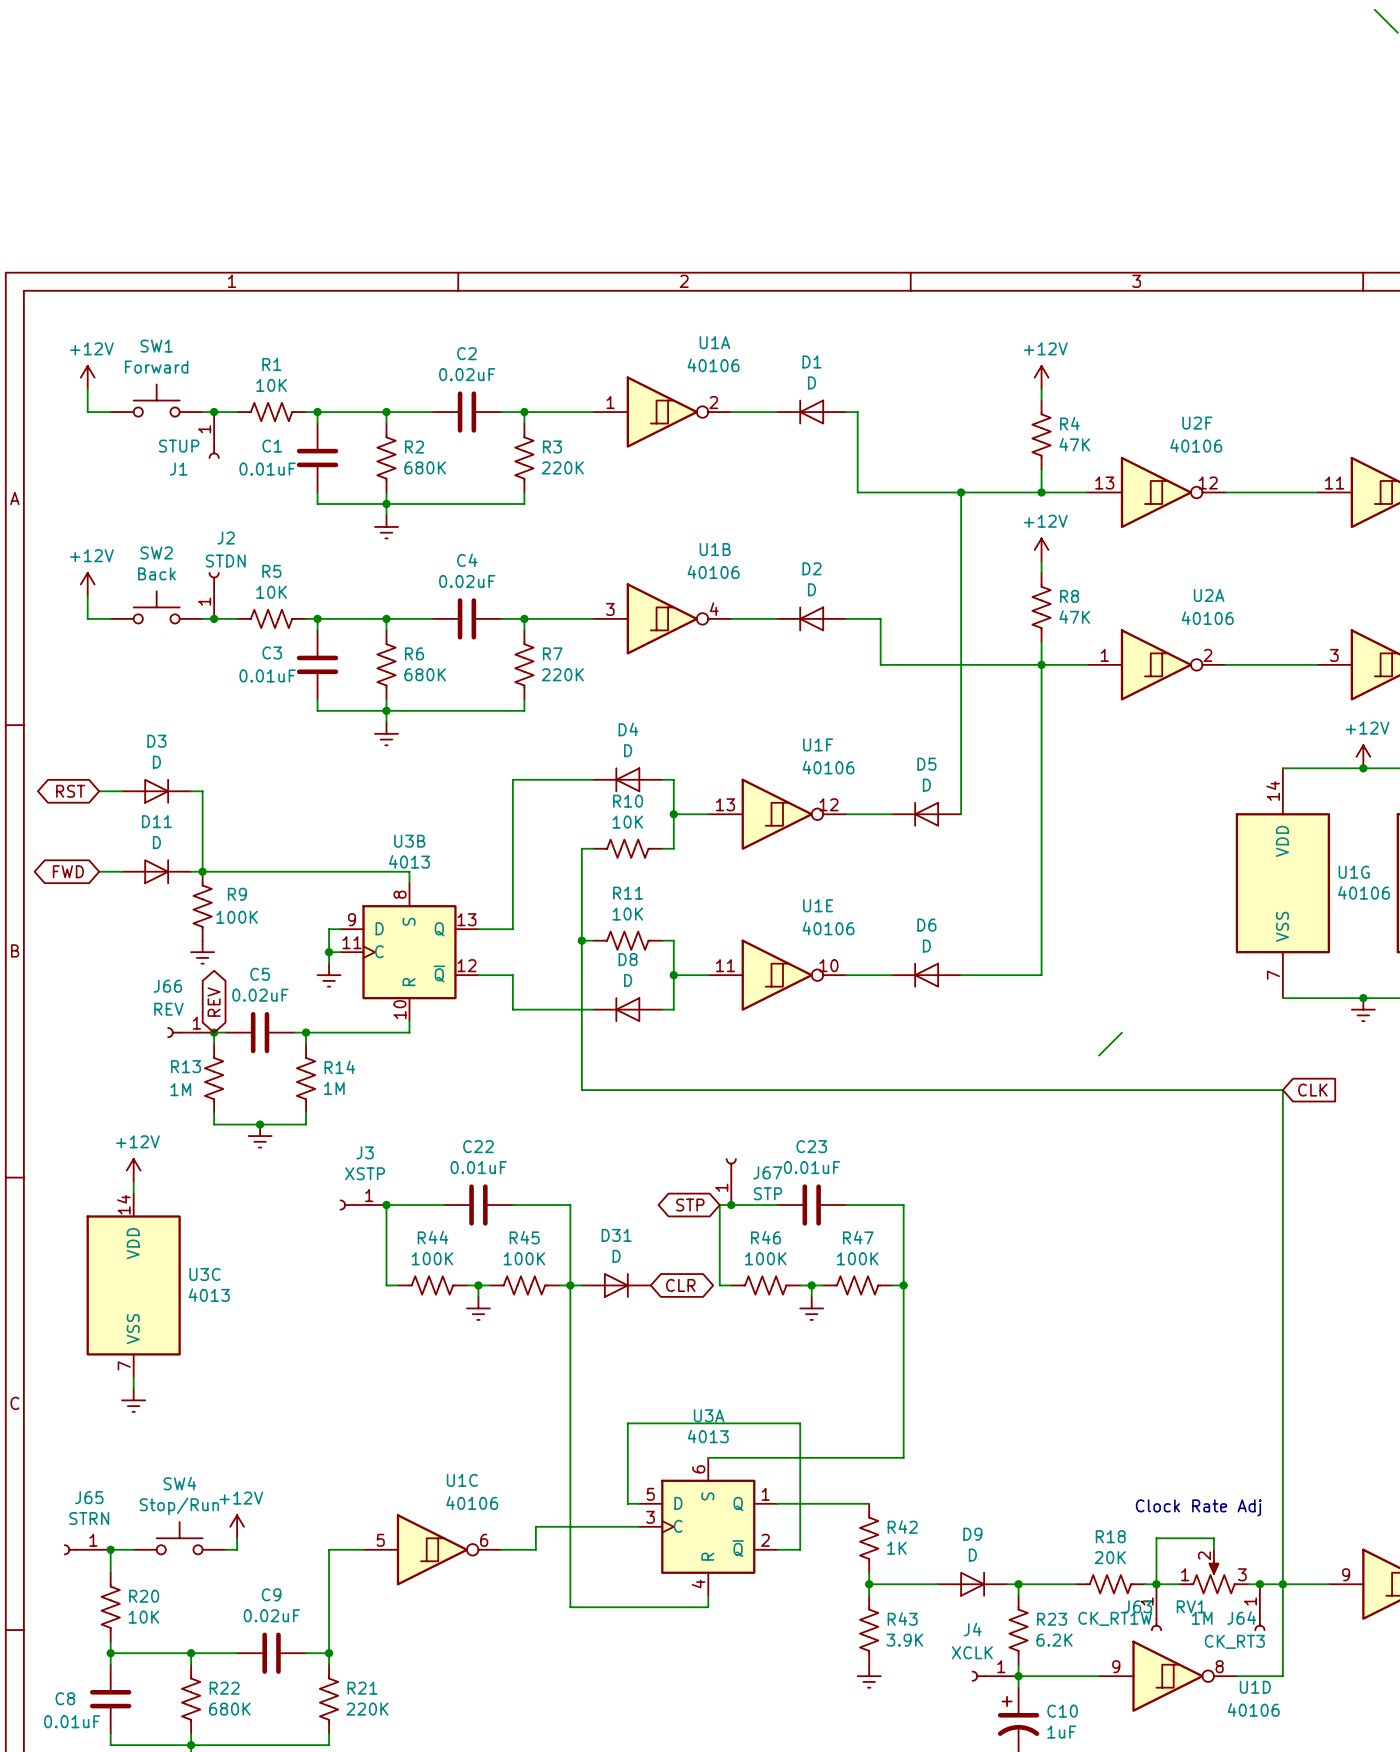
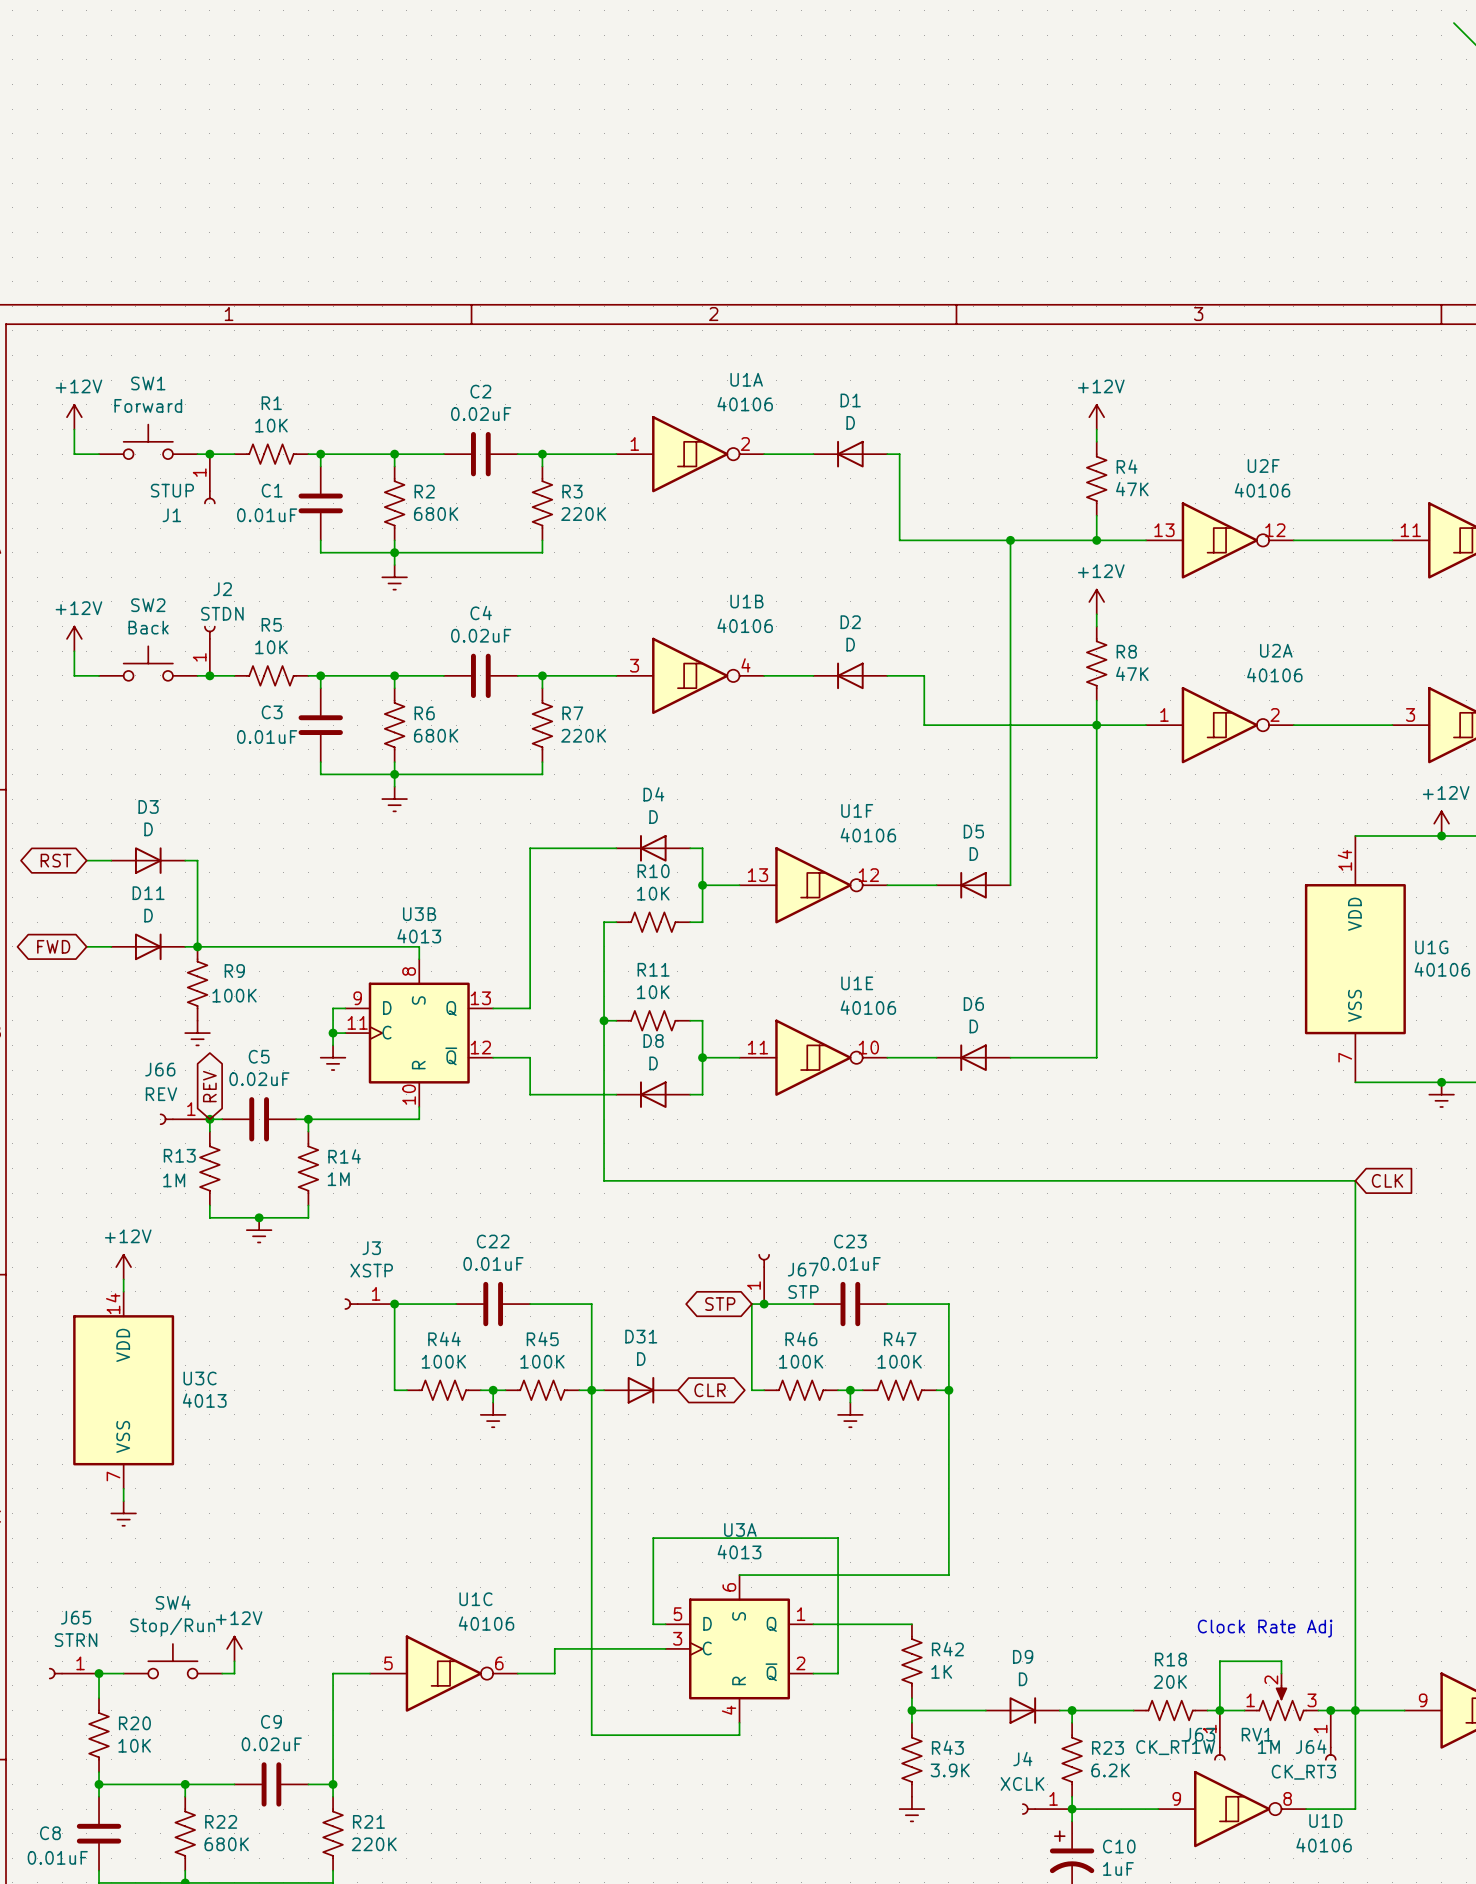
wire: (1122, 1032) (1099, 1055) -> none

